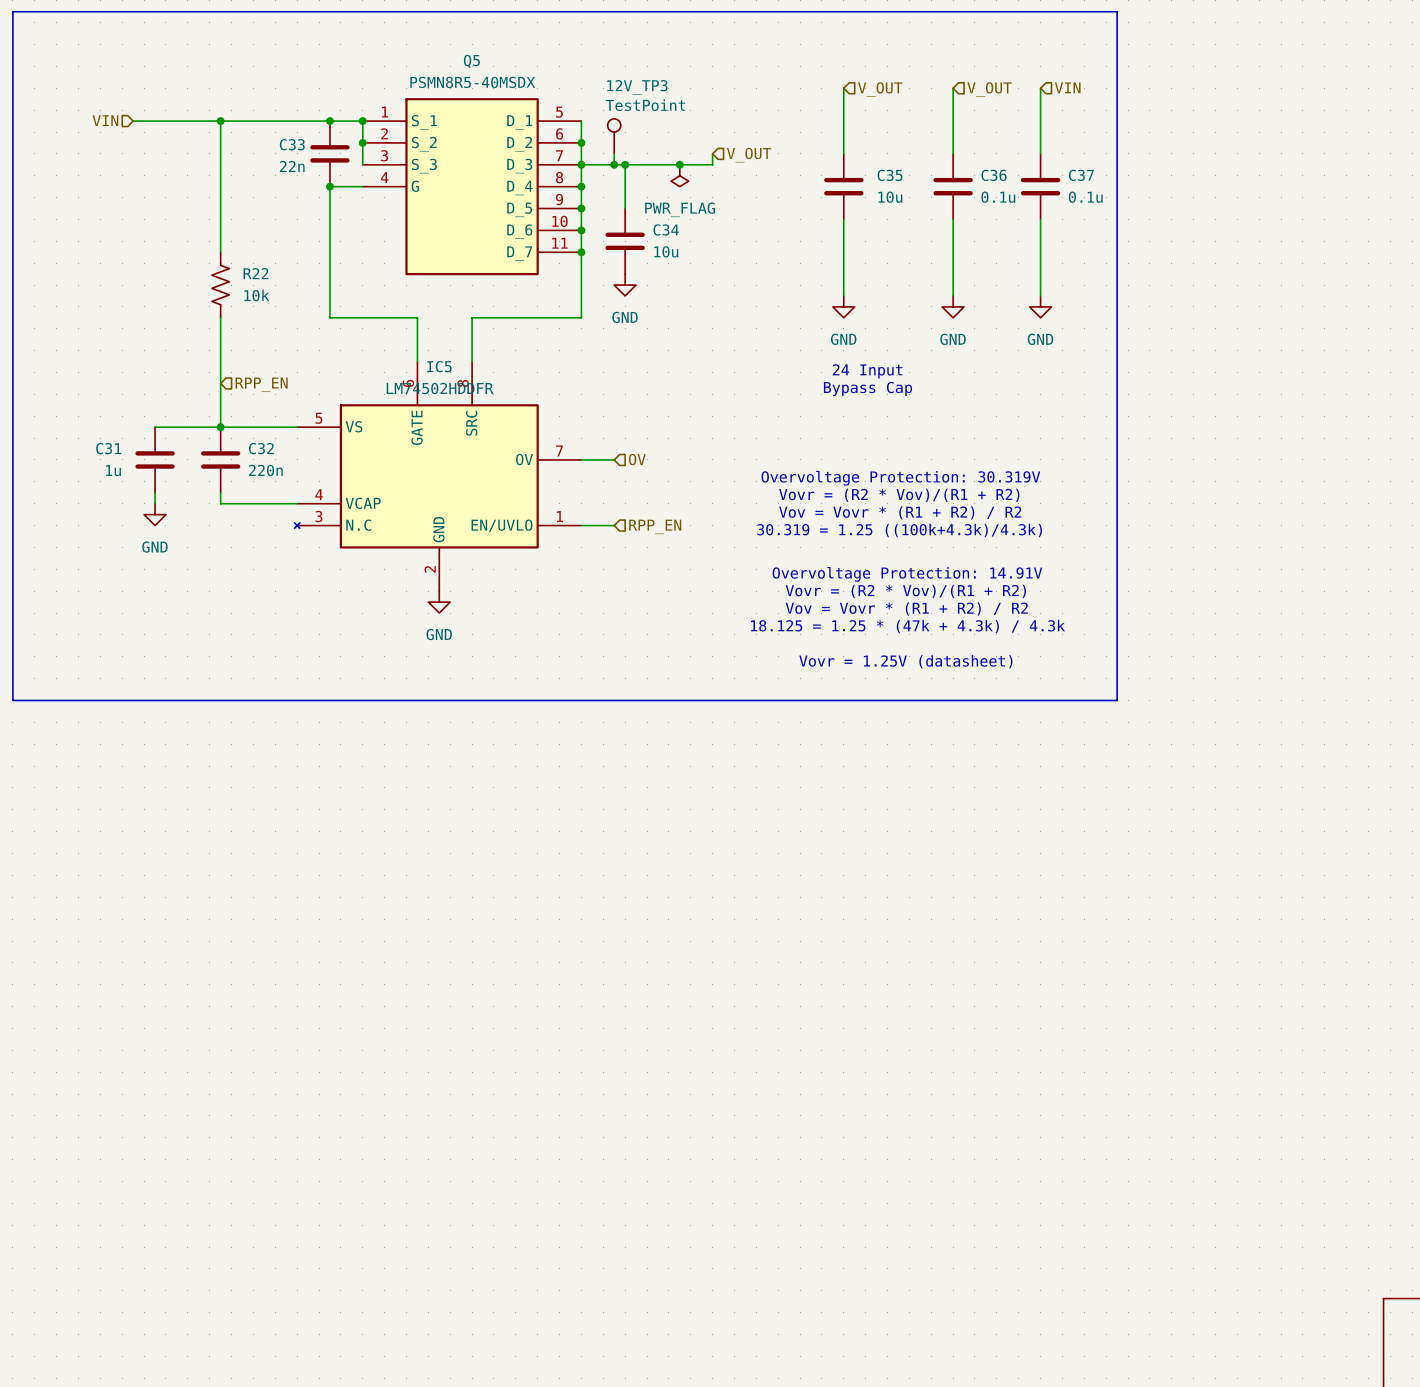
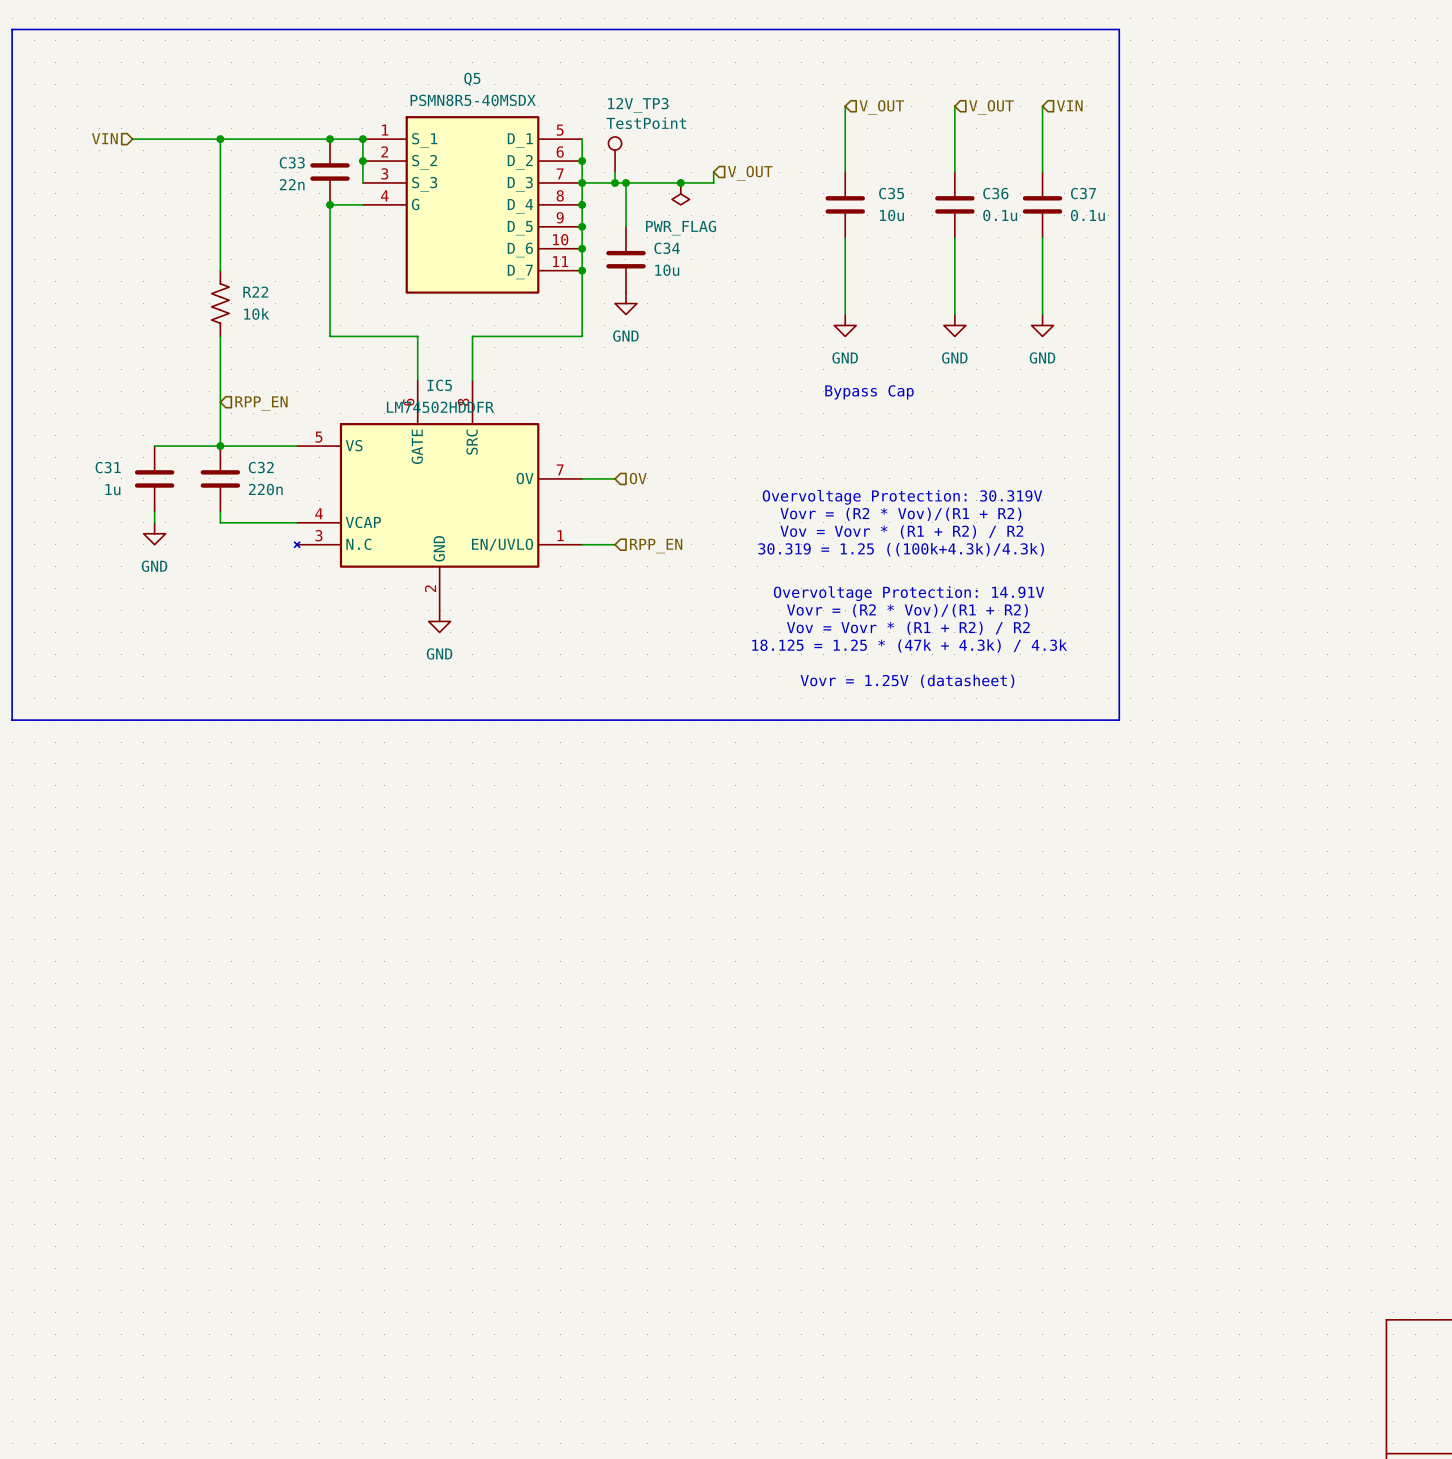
text: 24 Input (867, 371) -> Bypass Cap (869, 392)
text: Bypass Cap (867, 388) -> none

